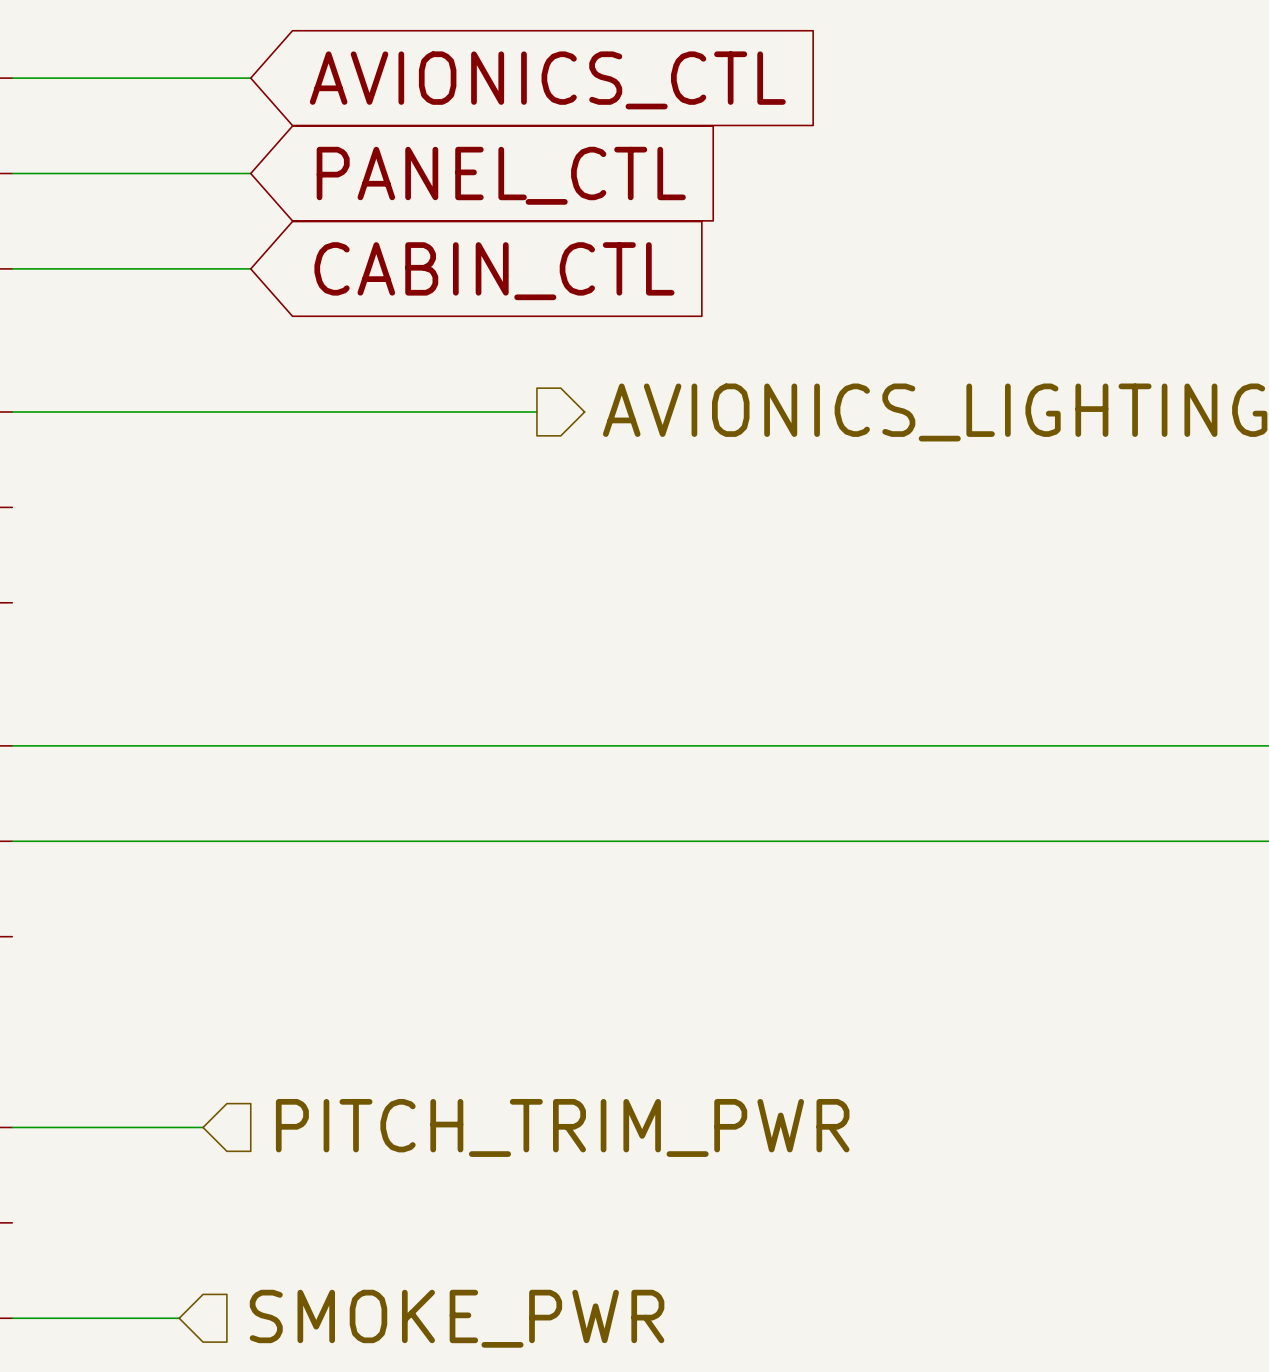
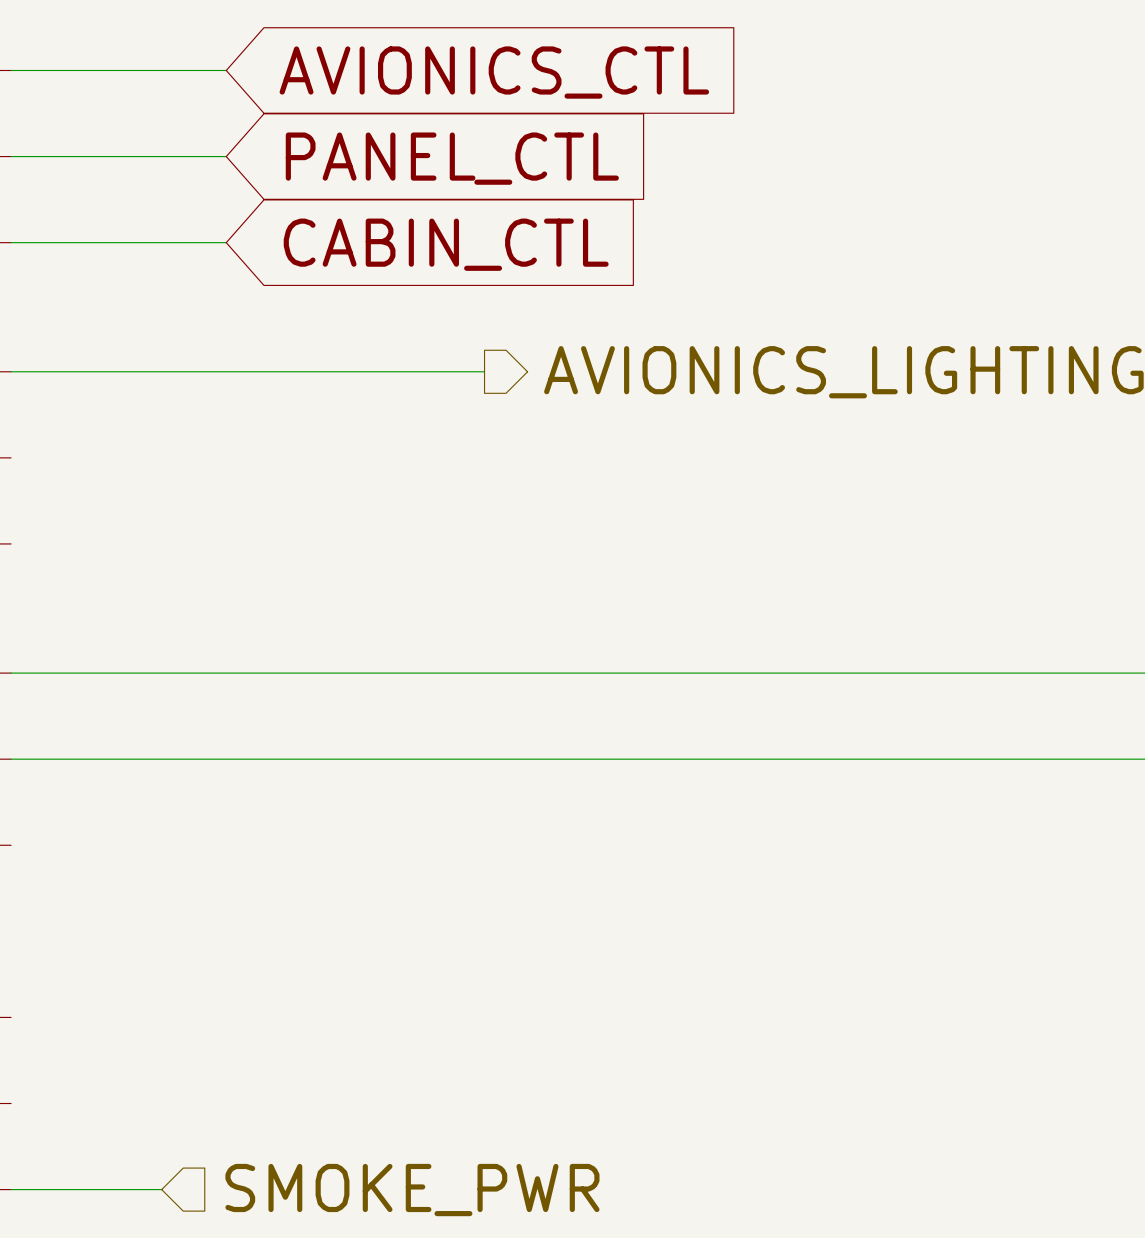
wire: (12, 1127) (203, 1127) -> none
hierarchical label: PITCH_TRIM_PWR (562, 1127) -> none

